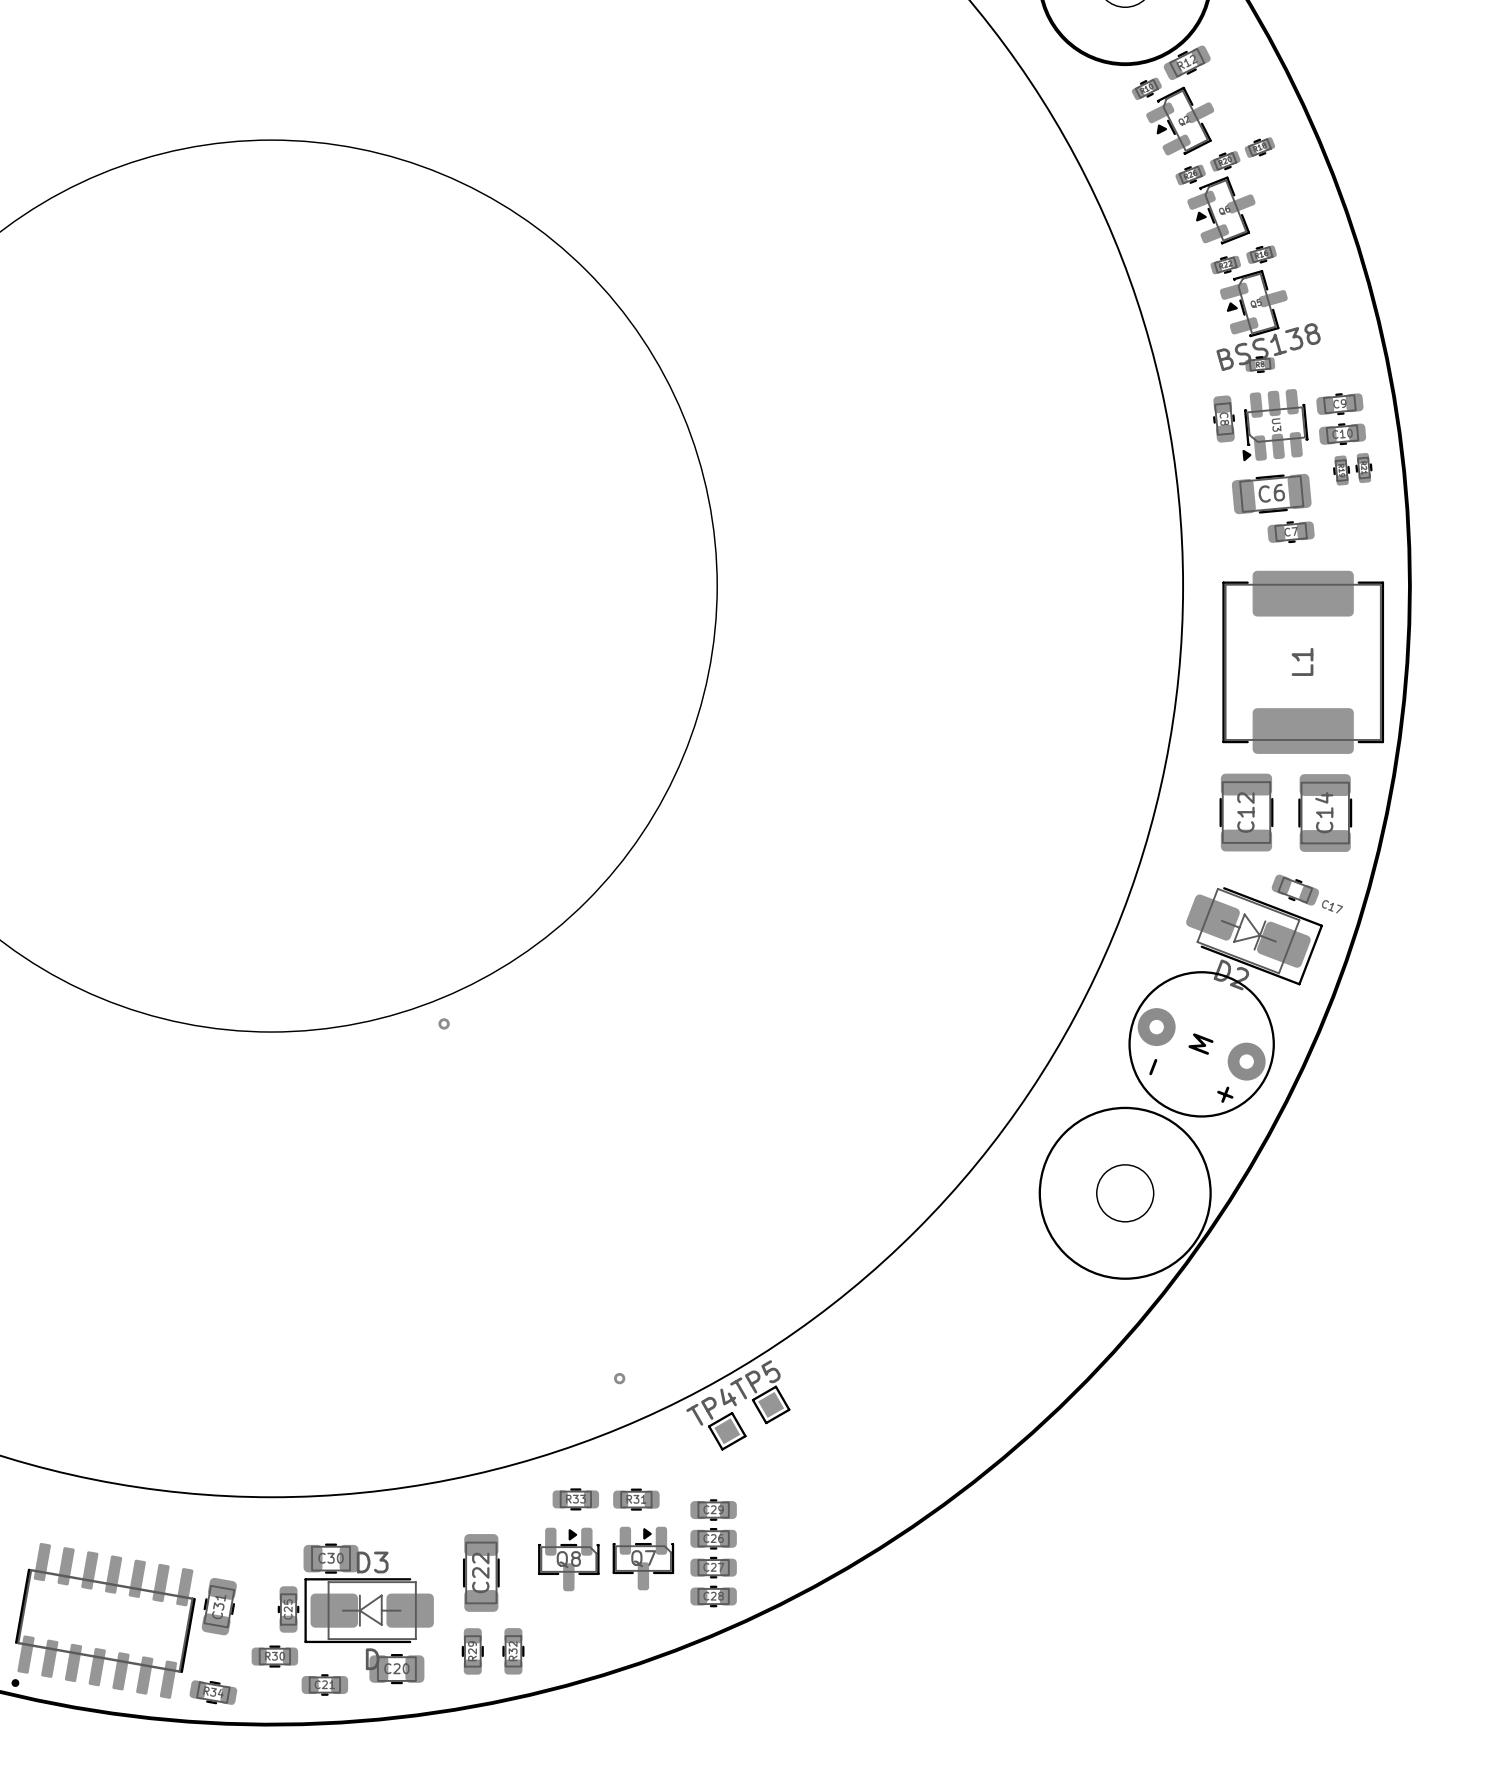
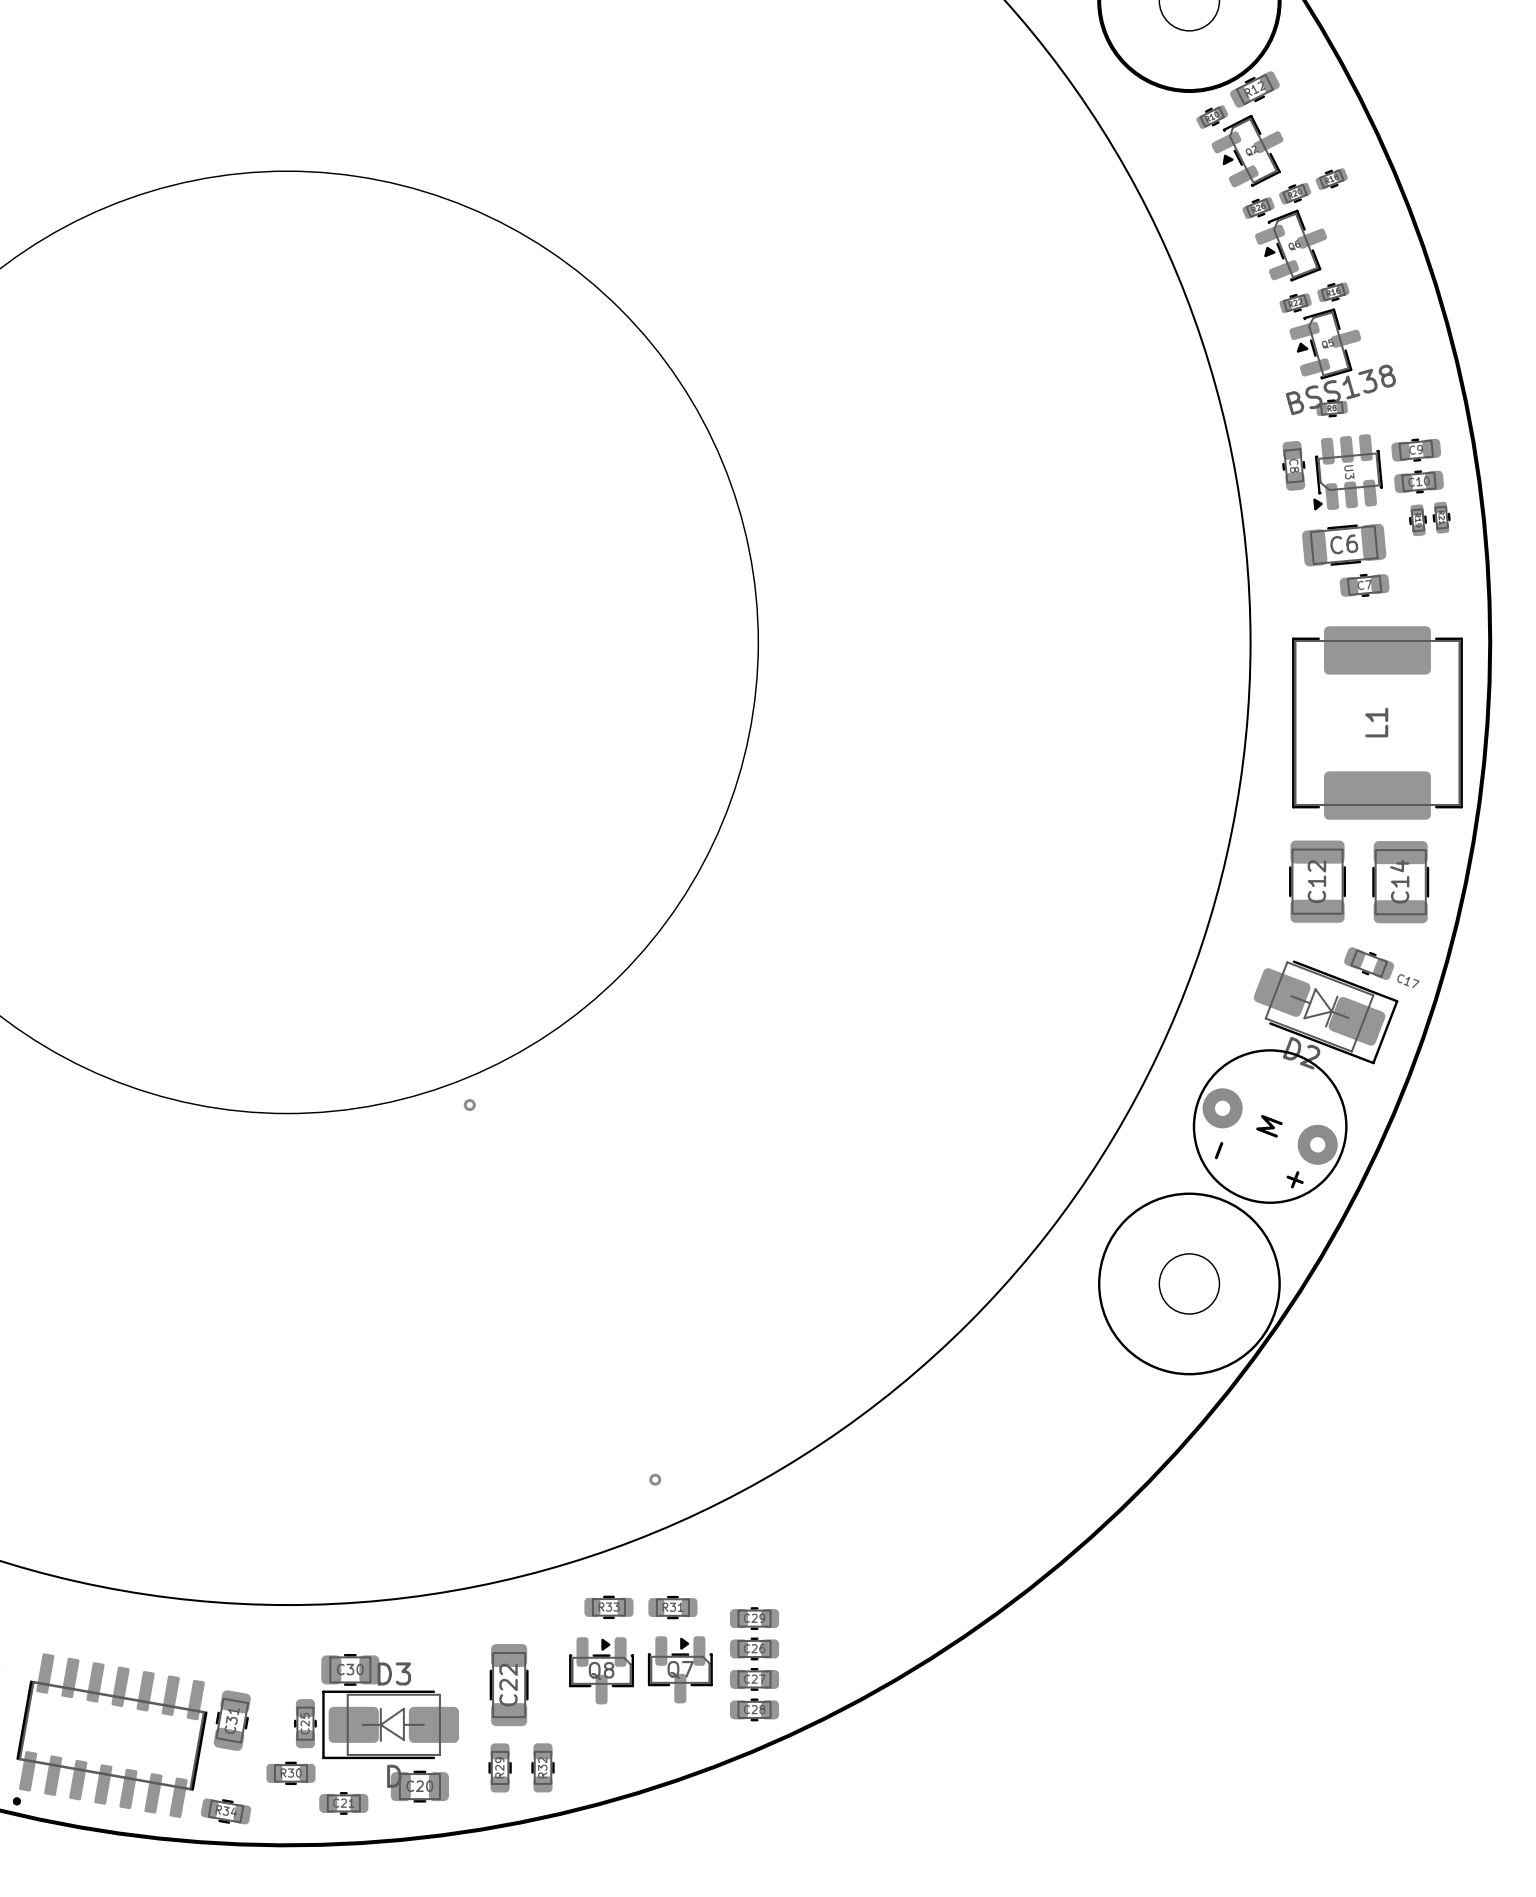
TP5: (771, 1404) -> none
TP4: (727, 1431) -> none

